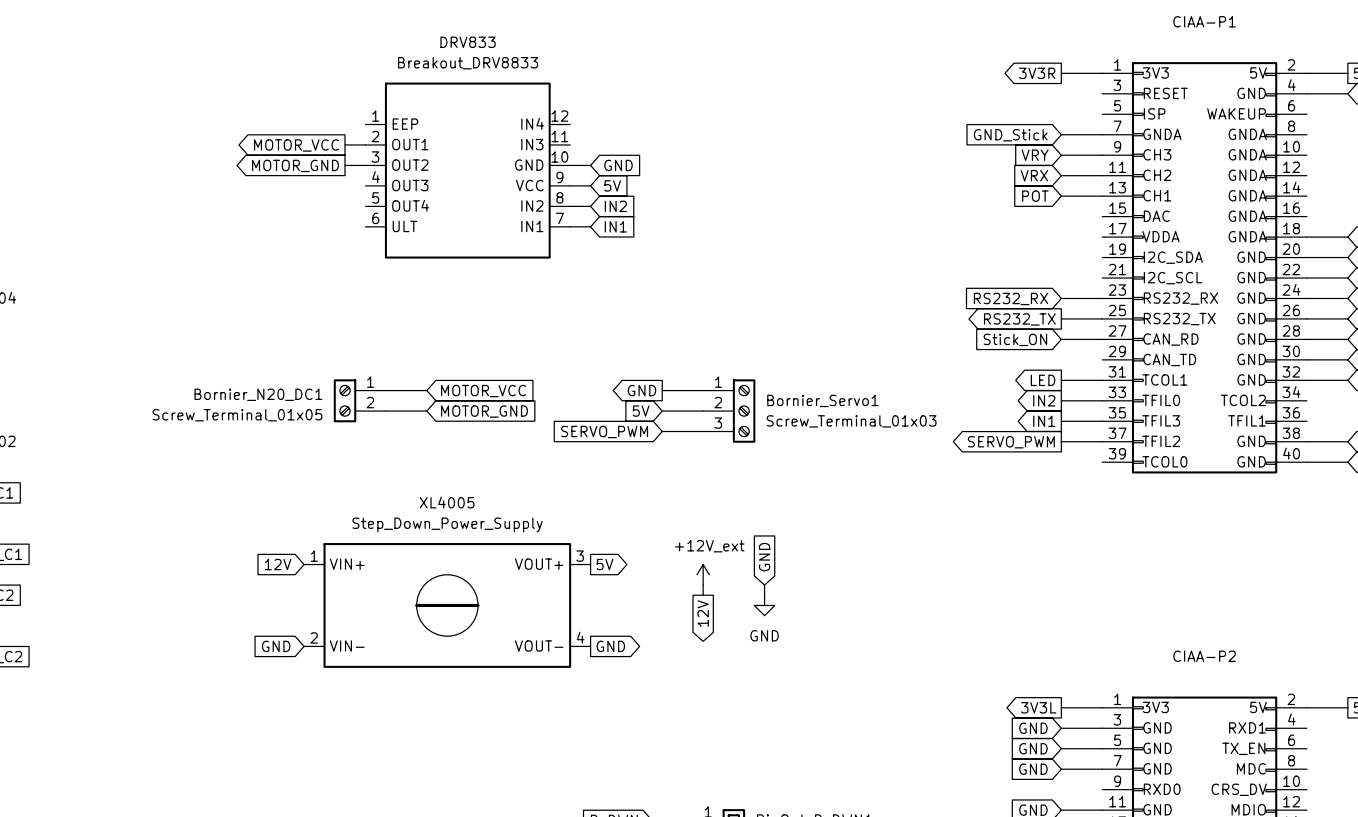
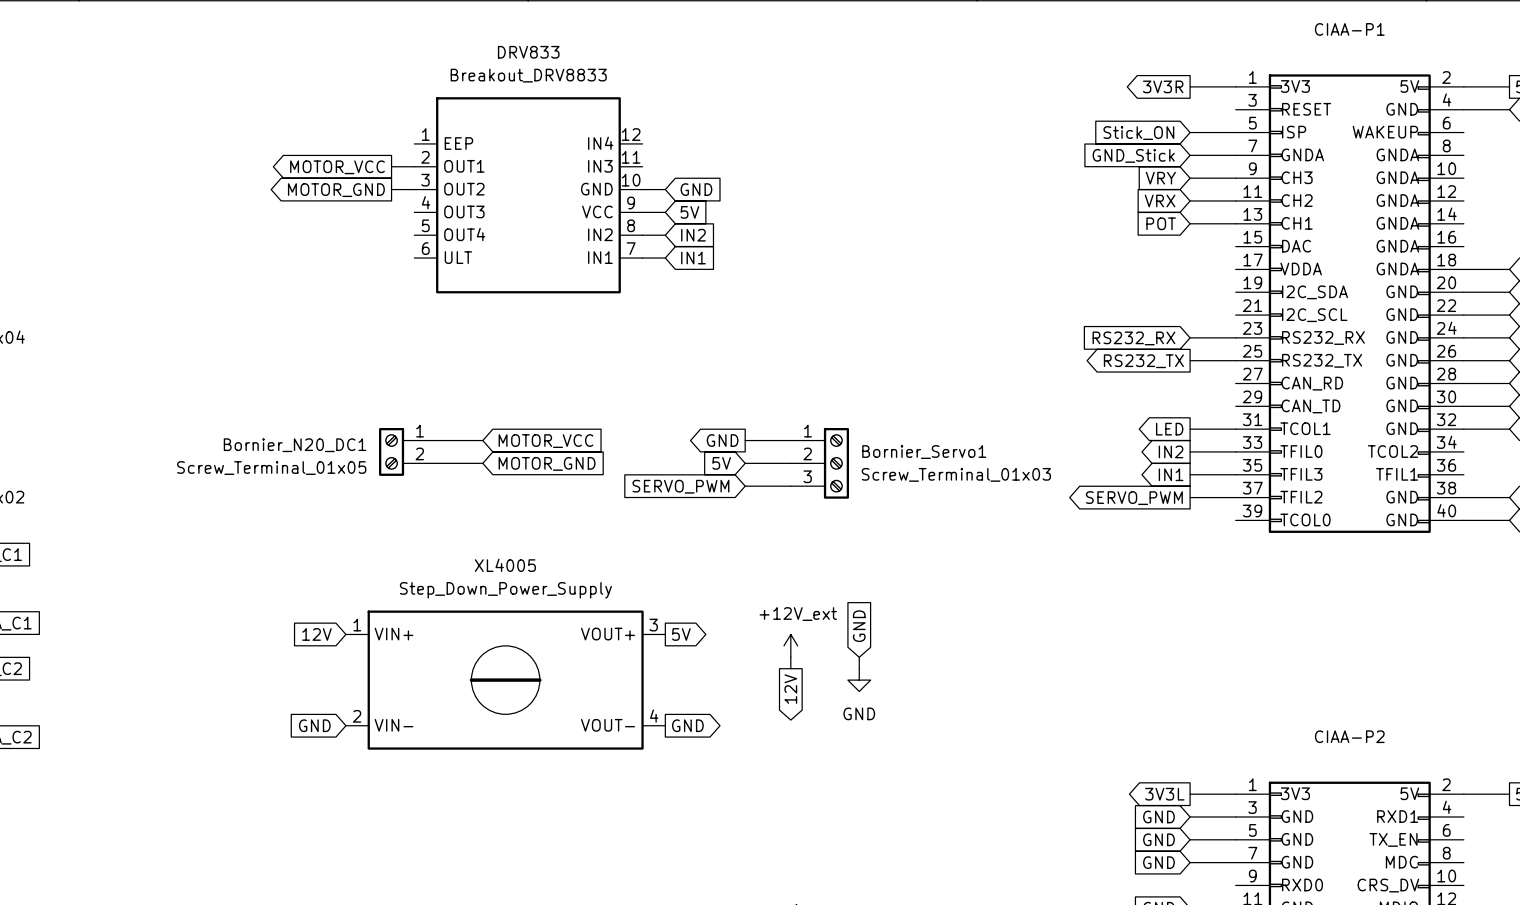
global label: none -> Stick_ON (1138, 133)
wire: none -> (1190, 132) (1235, 132)
global label: Stick_ON (1015, 339) -> none
wire: (1061, 339) (1102, 339) -> none

